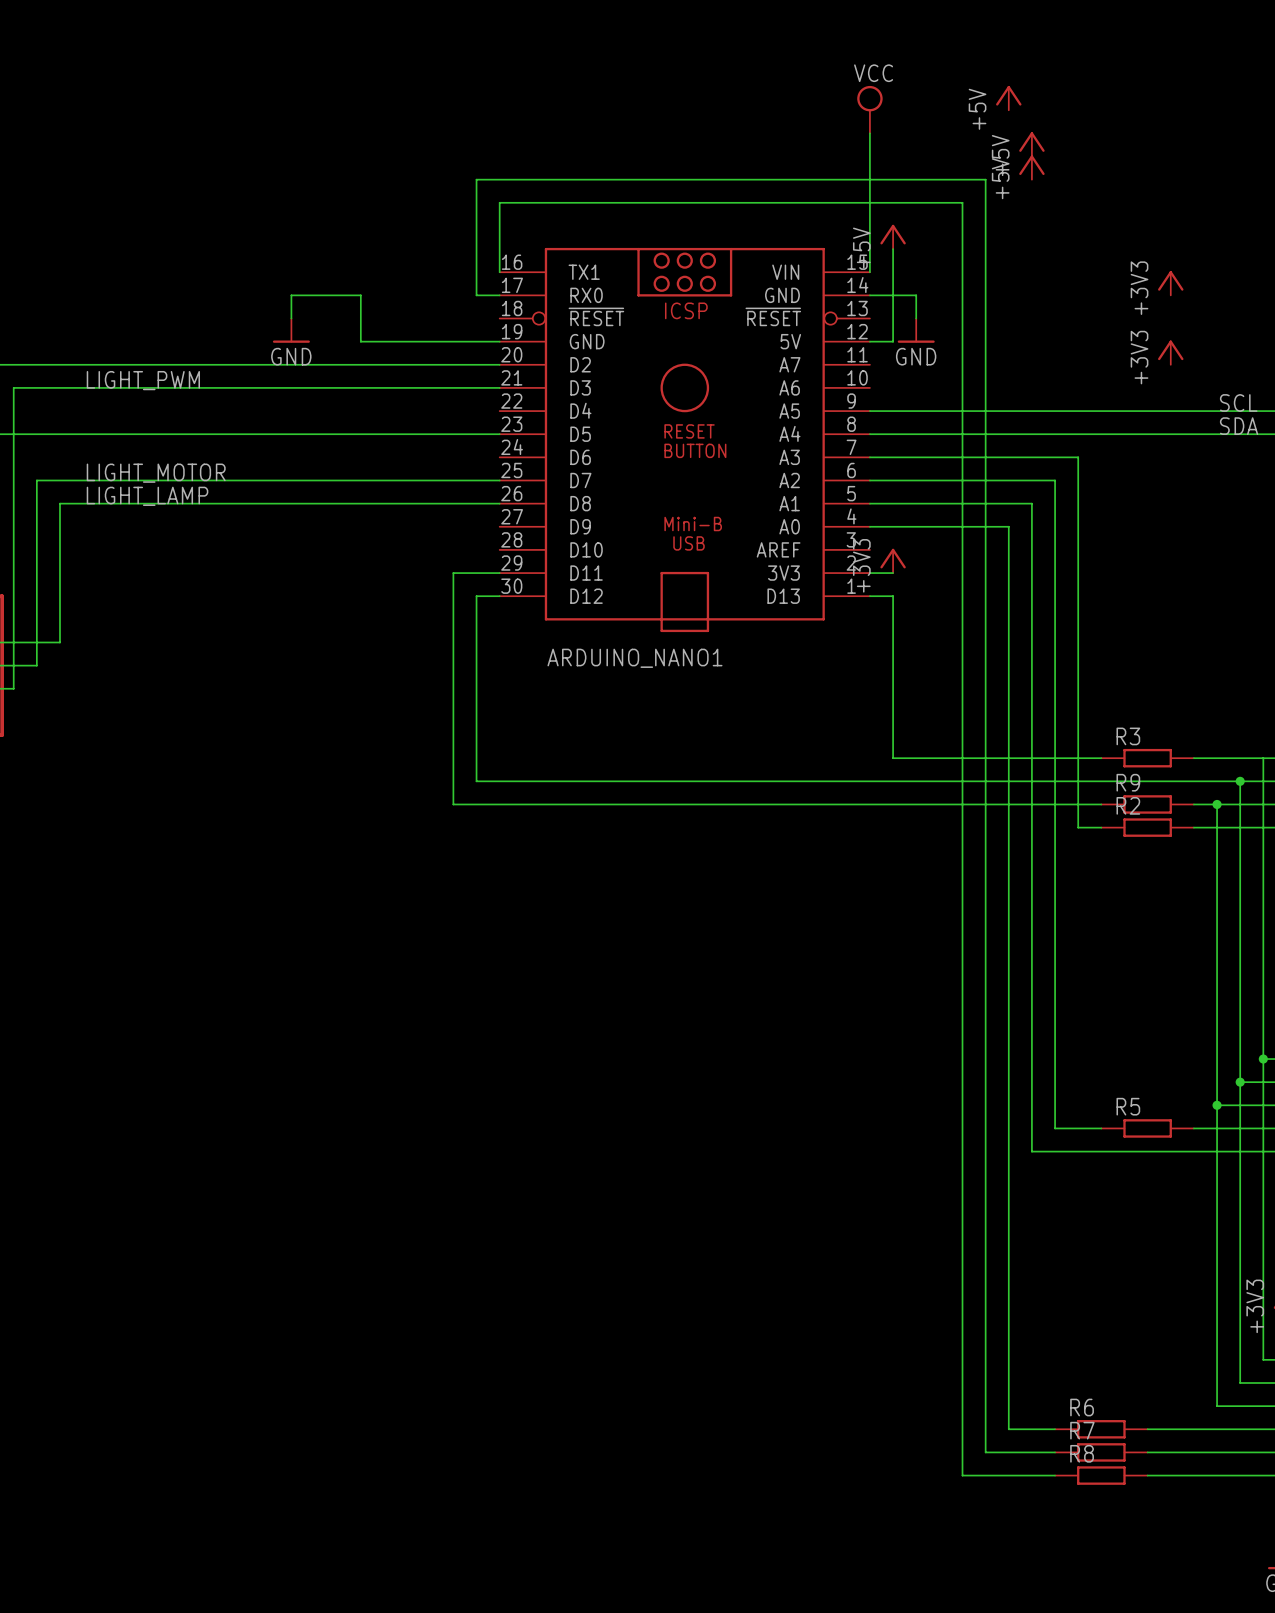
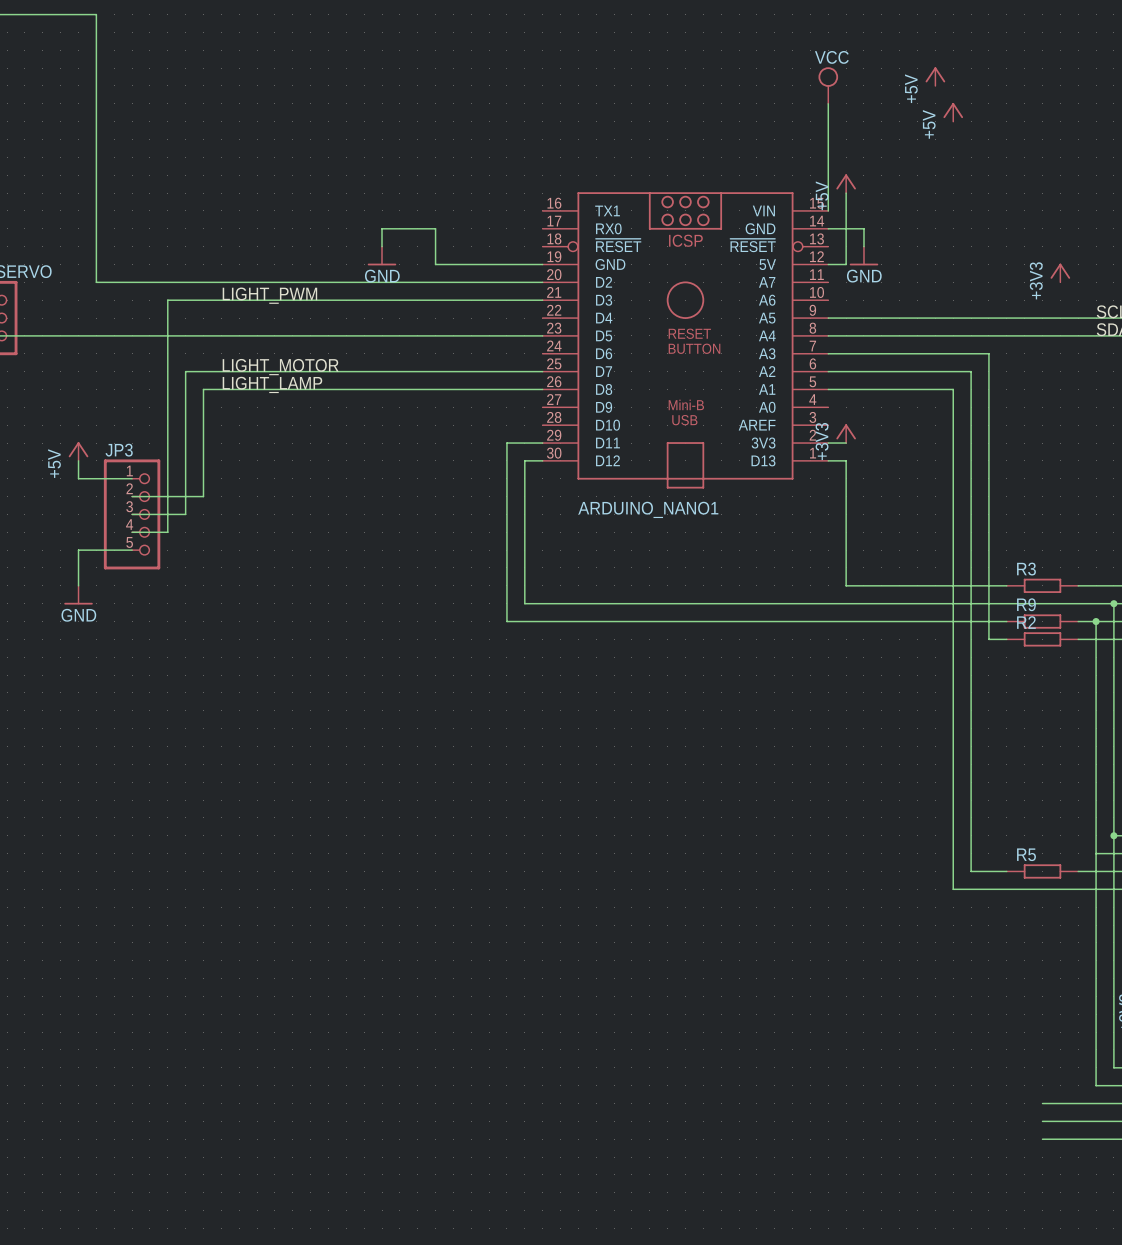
power symbol: +5V (1031, 167) -> none
wire: (499, 272) (499, 202) (962, 202) (962, 1475) (1055, 1475) -> none
power symbol: +3V3 (1170, 283) -> none
wire: (499, 295) (476, 295) (476, 179) (985, 179) (985, 1452) (1055, 1452) -> none
wire: (869, 526) (1008, 526) (1008, 1429) (1055, 1429) -> none
junction: (1217, 1105) -> none
R6: (1101, 1429) -> none
R7: (1101, 1452) -> none
R8: (1101, 1475) -> none

